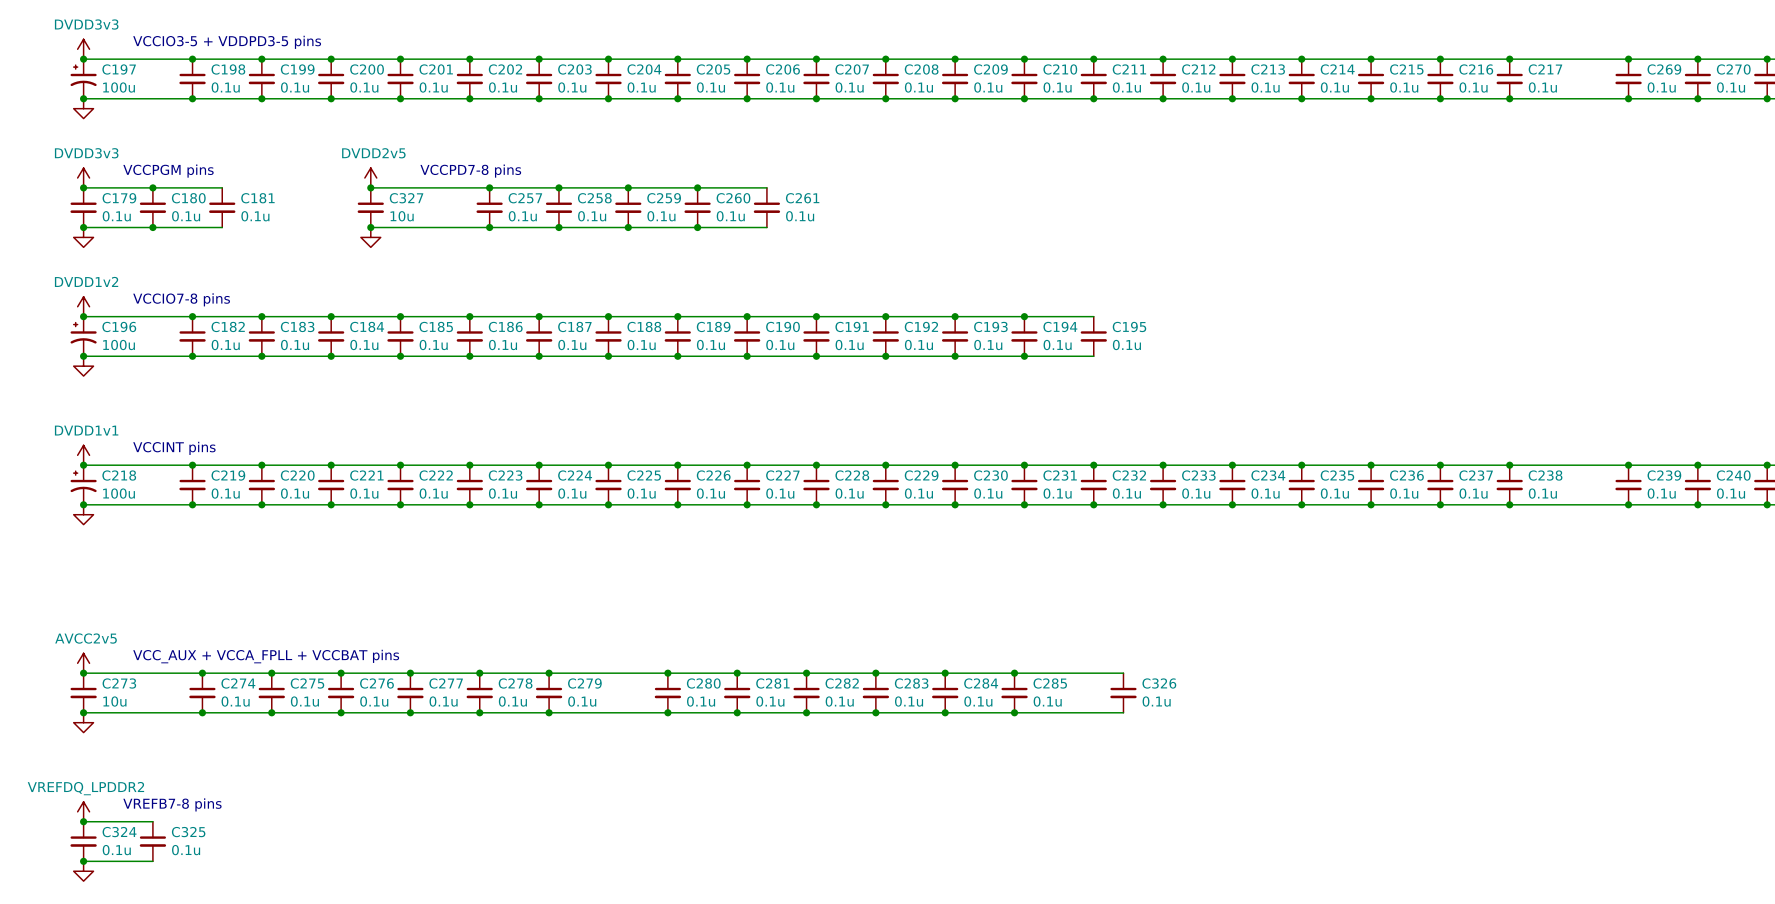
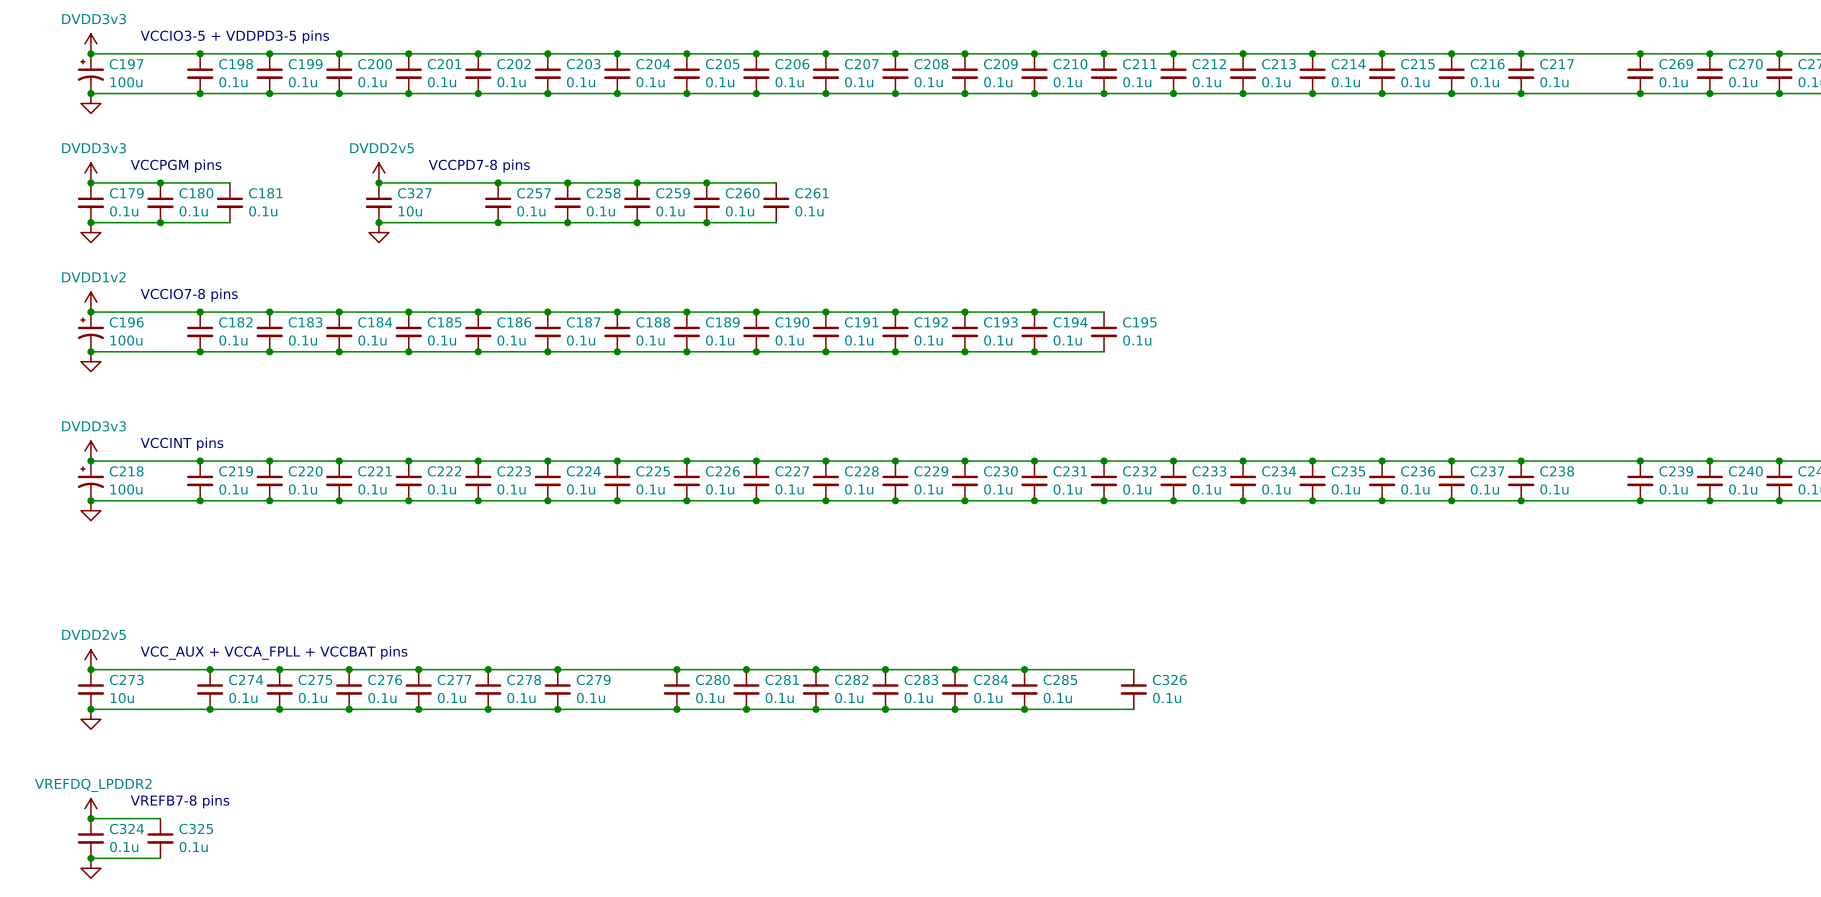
power symbol: DVDD1v1 (83, 455) -> DVDD3v3 (90, 451)
power symbol: AVCC2v5 (83, 663) -> DVDD2v5 (90, 659)

